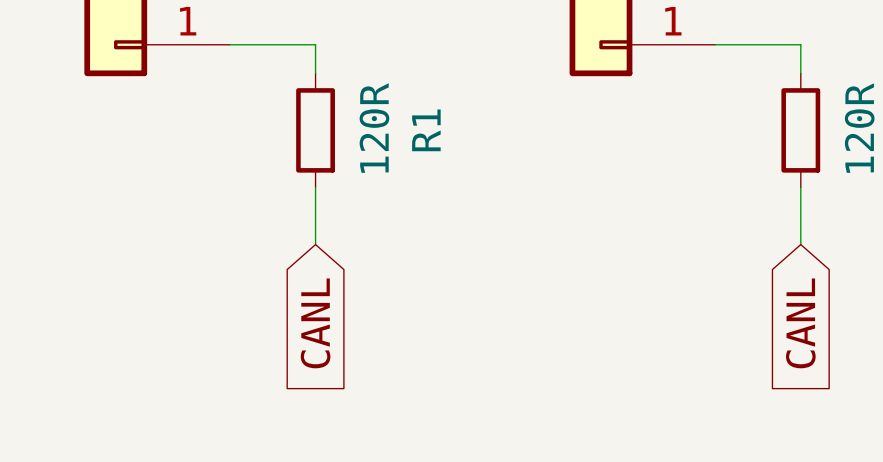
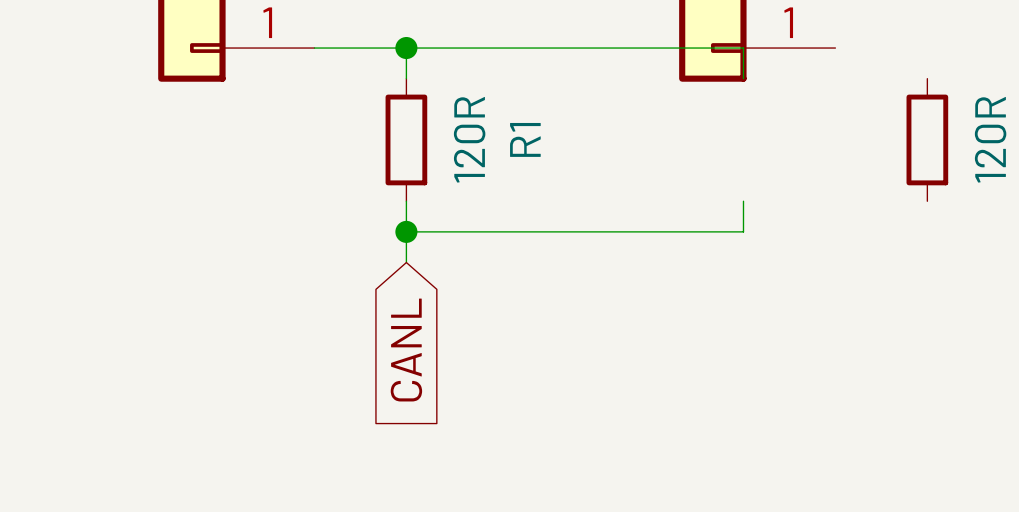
wire: none -> (406, 48) (743, 48) (743, 78)
junction: none -> (406, 48)
wire: (715, 44) (800, 44) (800, 73) -> none
wire: none -> (743, 201) (743, 231) (406, 231)
wire: (800, 187) (800, 244) -> none
junction: none -> (406, 231)
global label: CANL (800, 323) -> none

